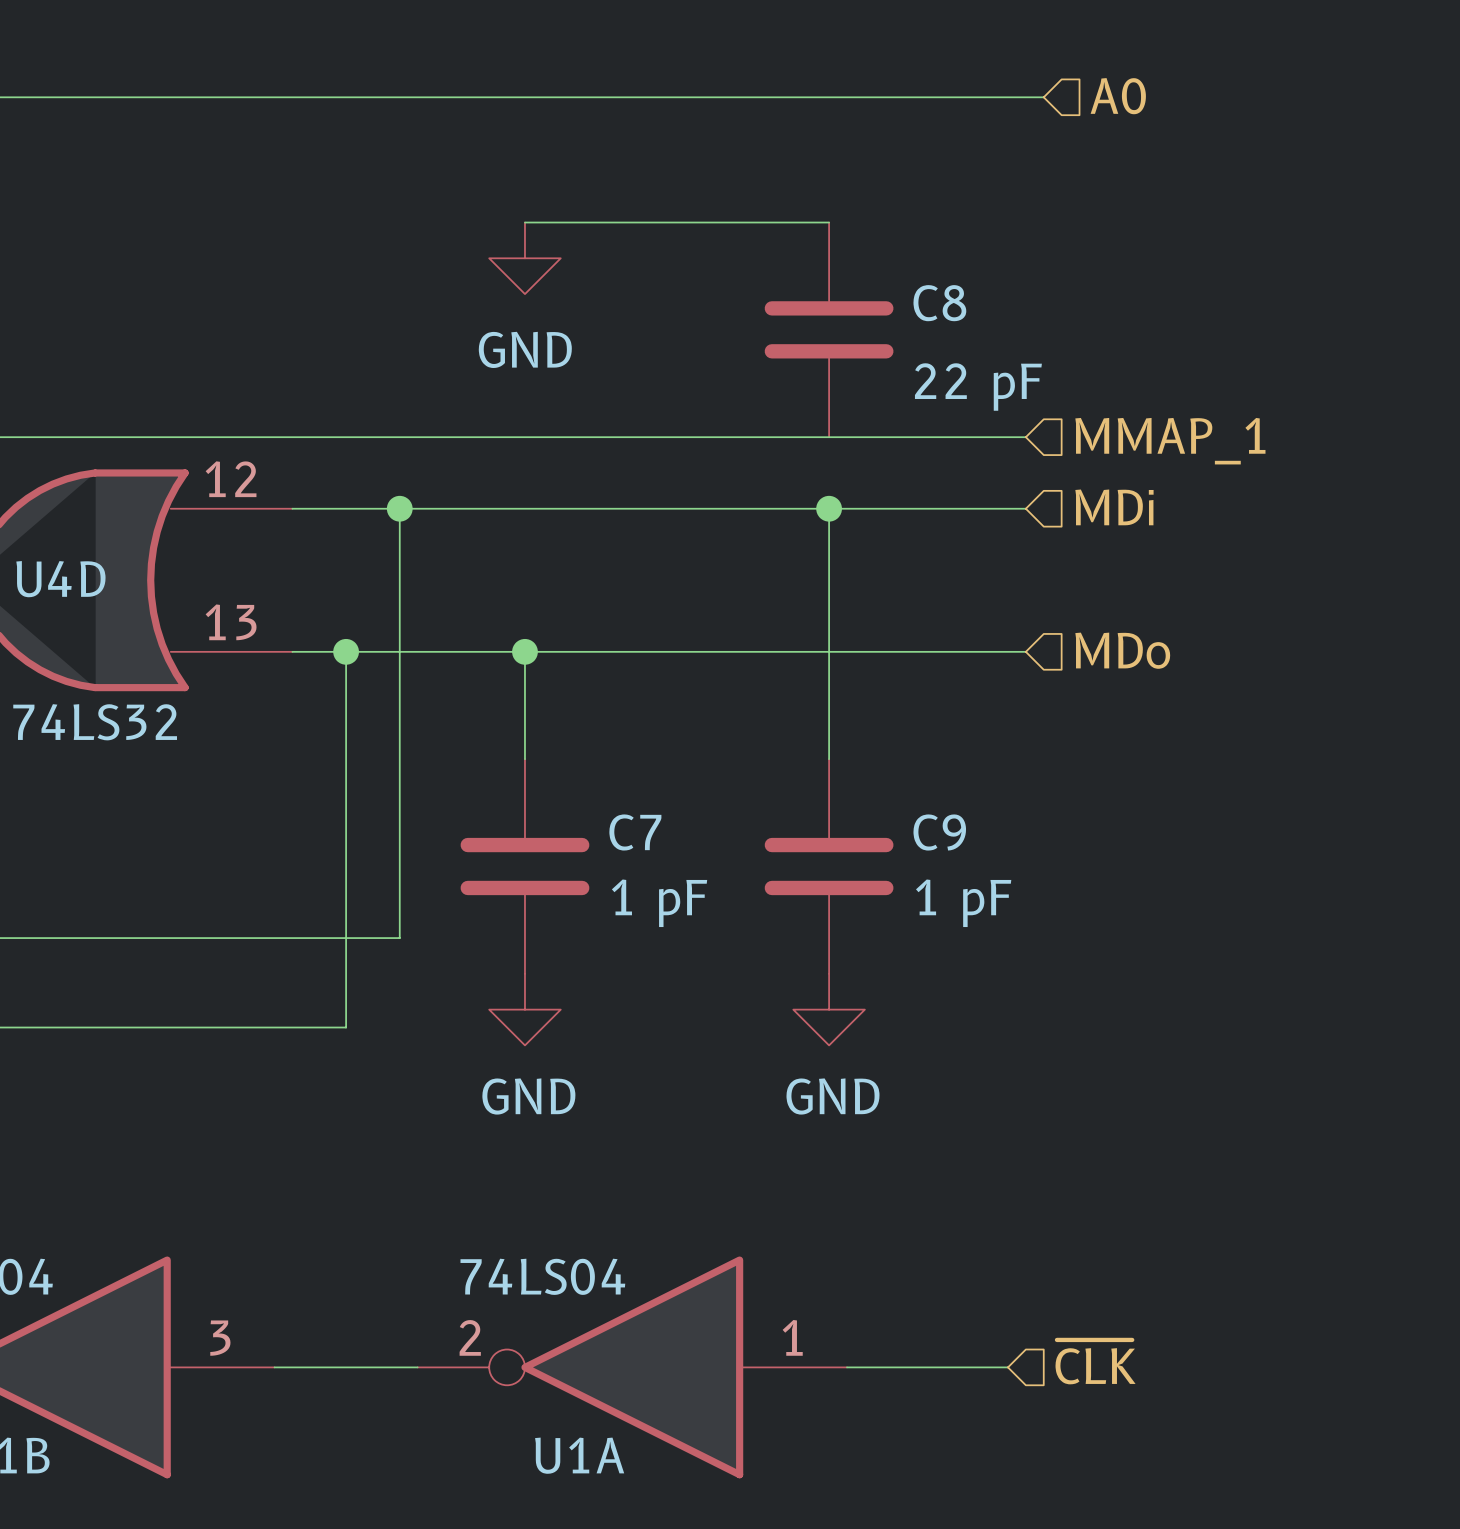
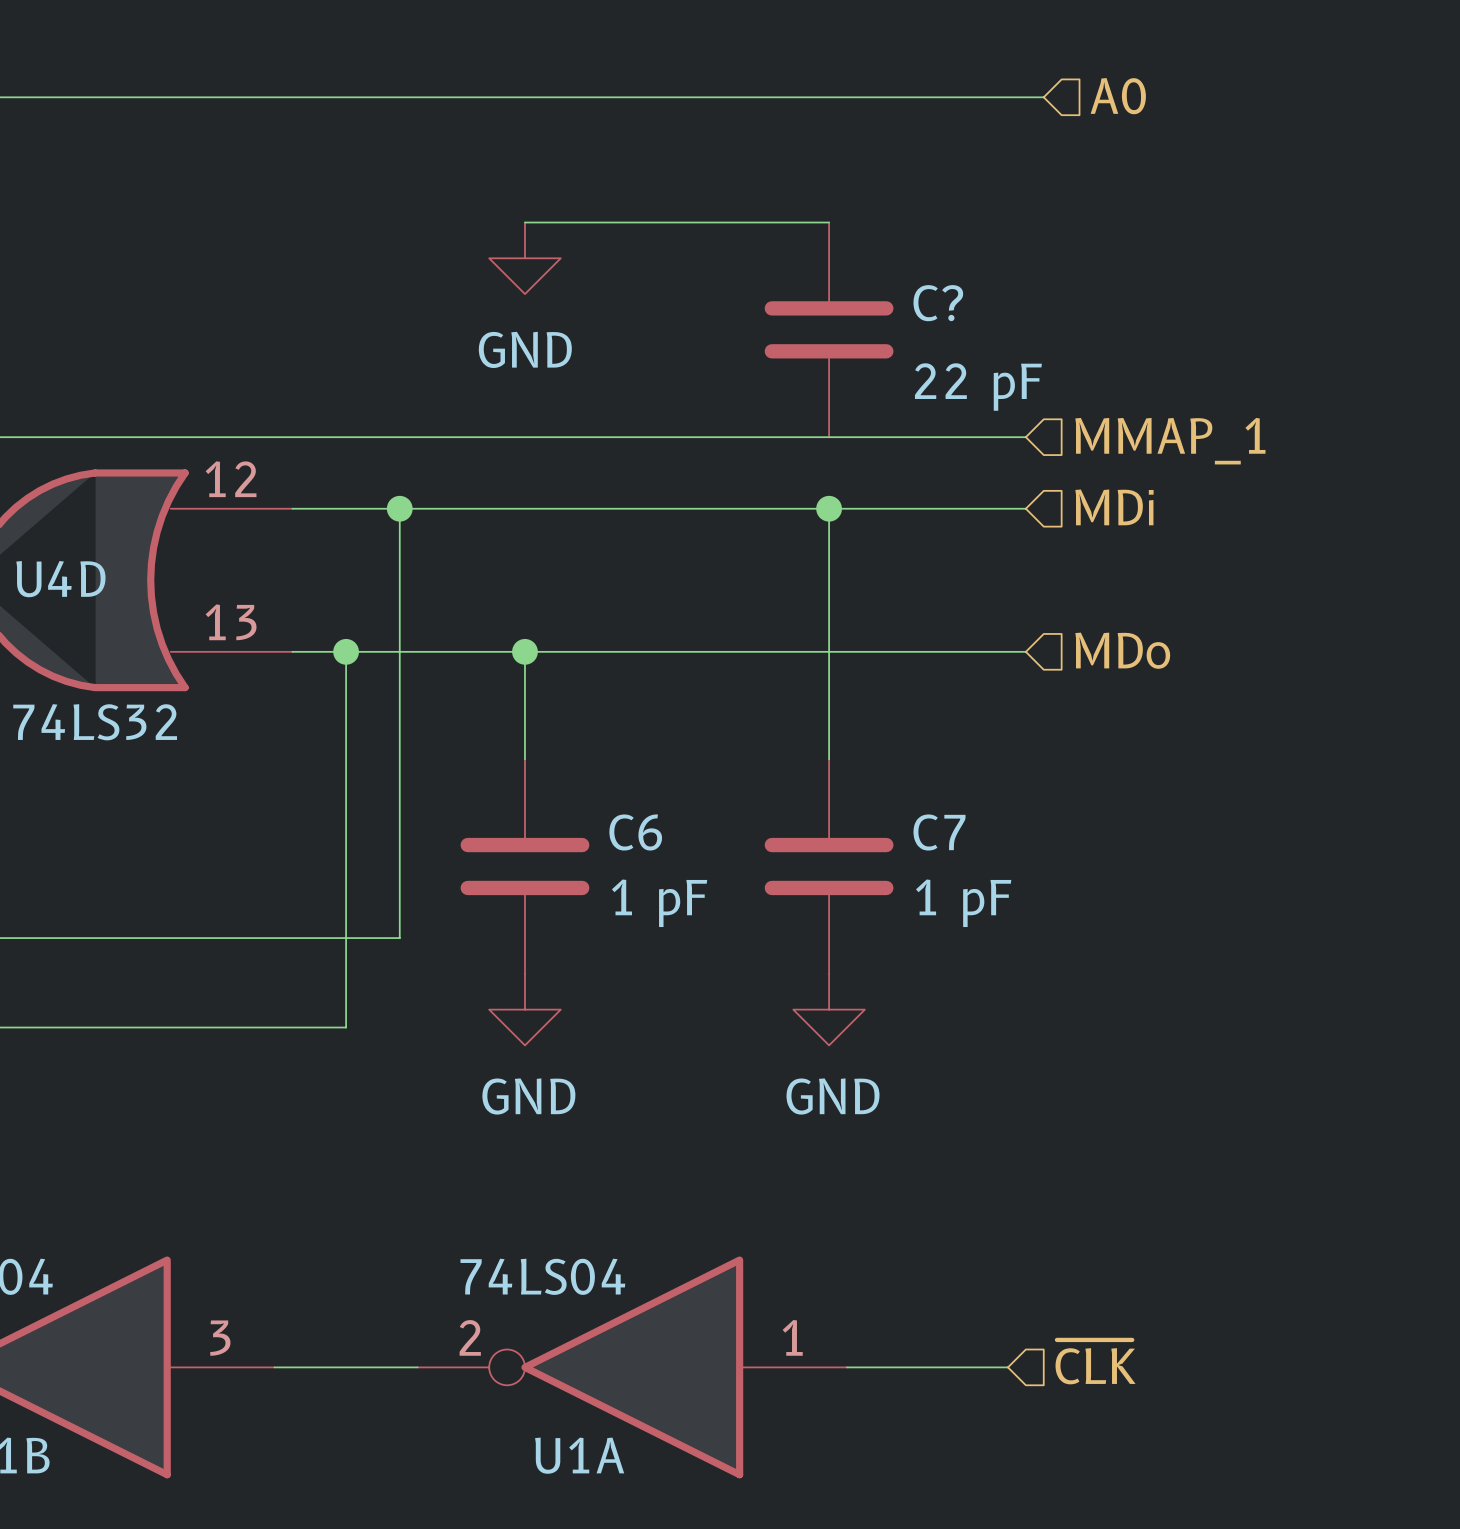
C8 name: C8 (939, 303) -> C? (938, 303)
C7 name: C7 (635, 832) -> C6 (635, 832)
C9 name: C9 (939, 832) -> C7 (939, 832)

